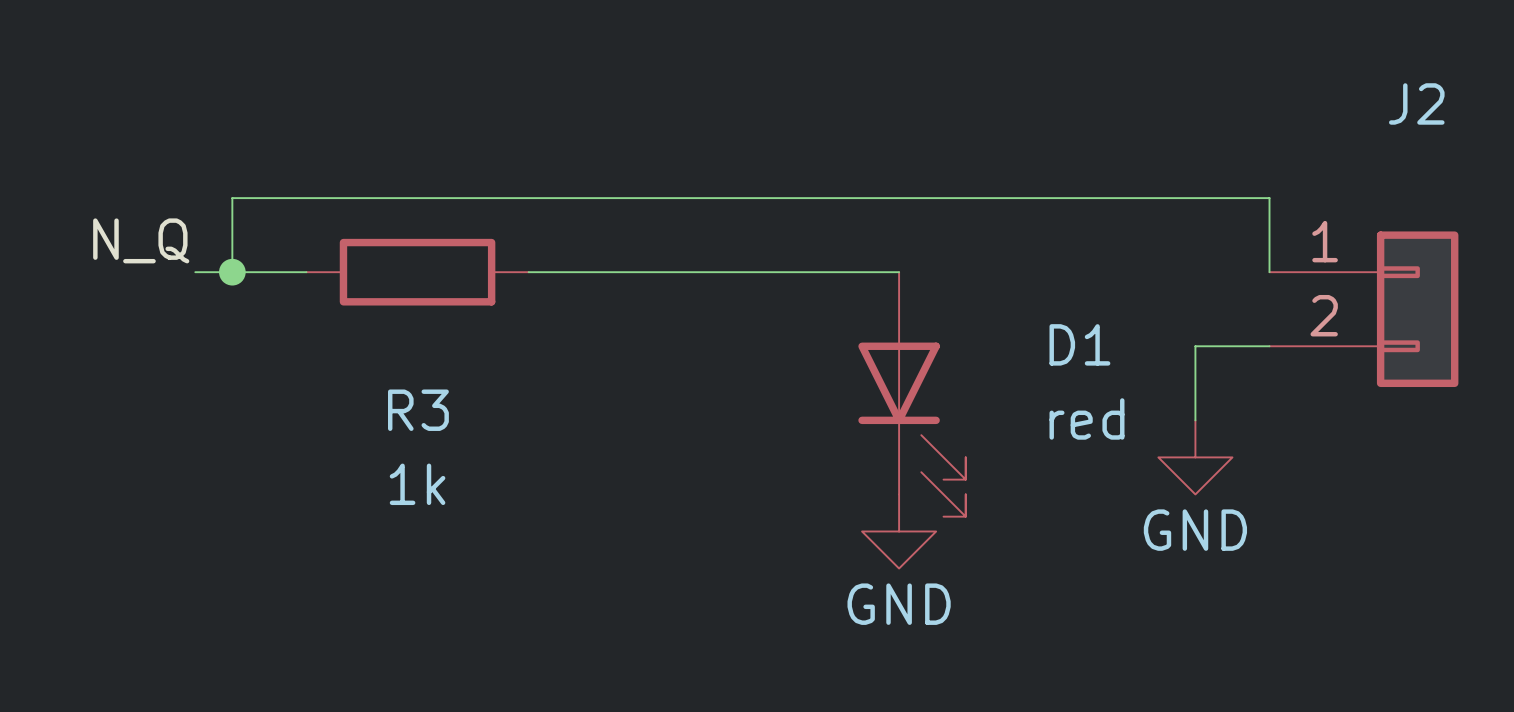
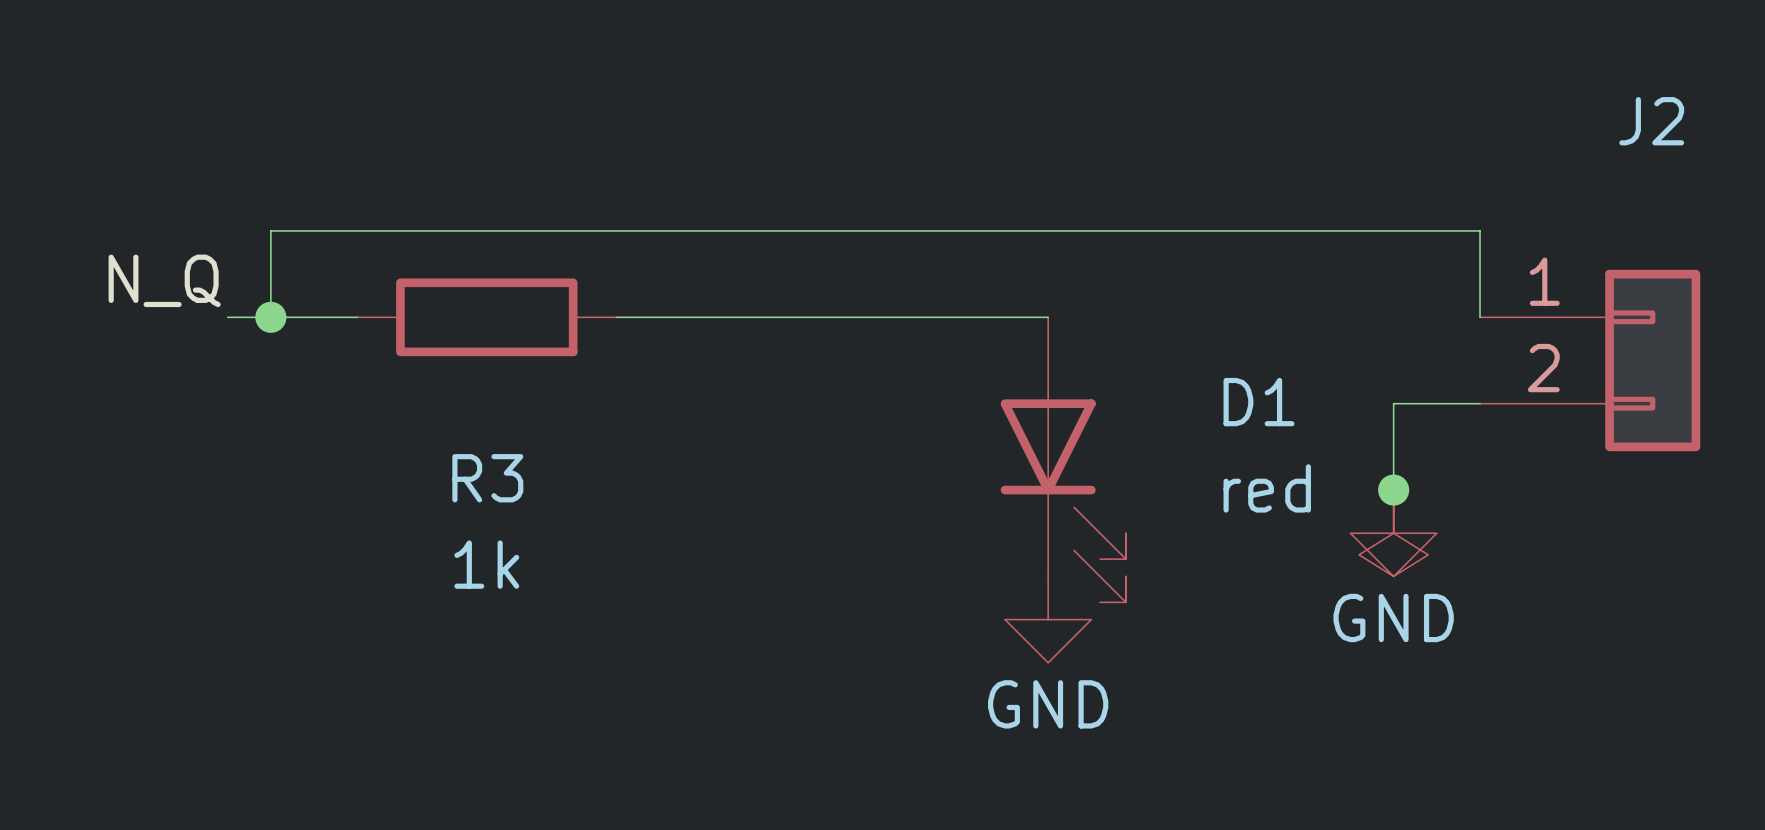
junction: none -> (1393, 490)
power symbol: none -> (1393, 533)

